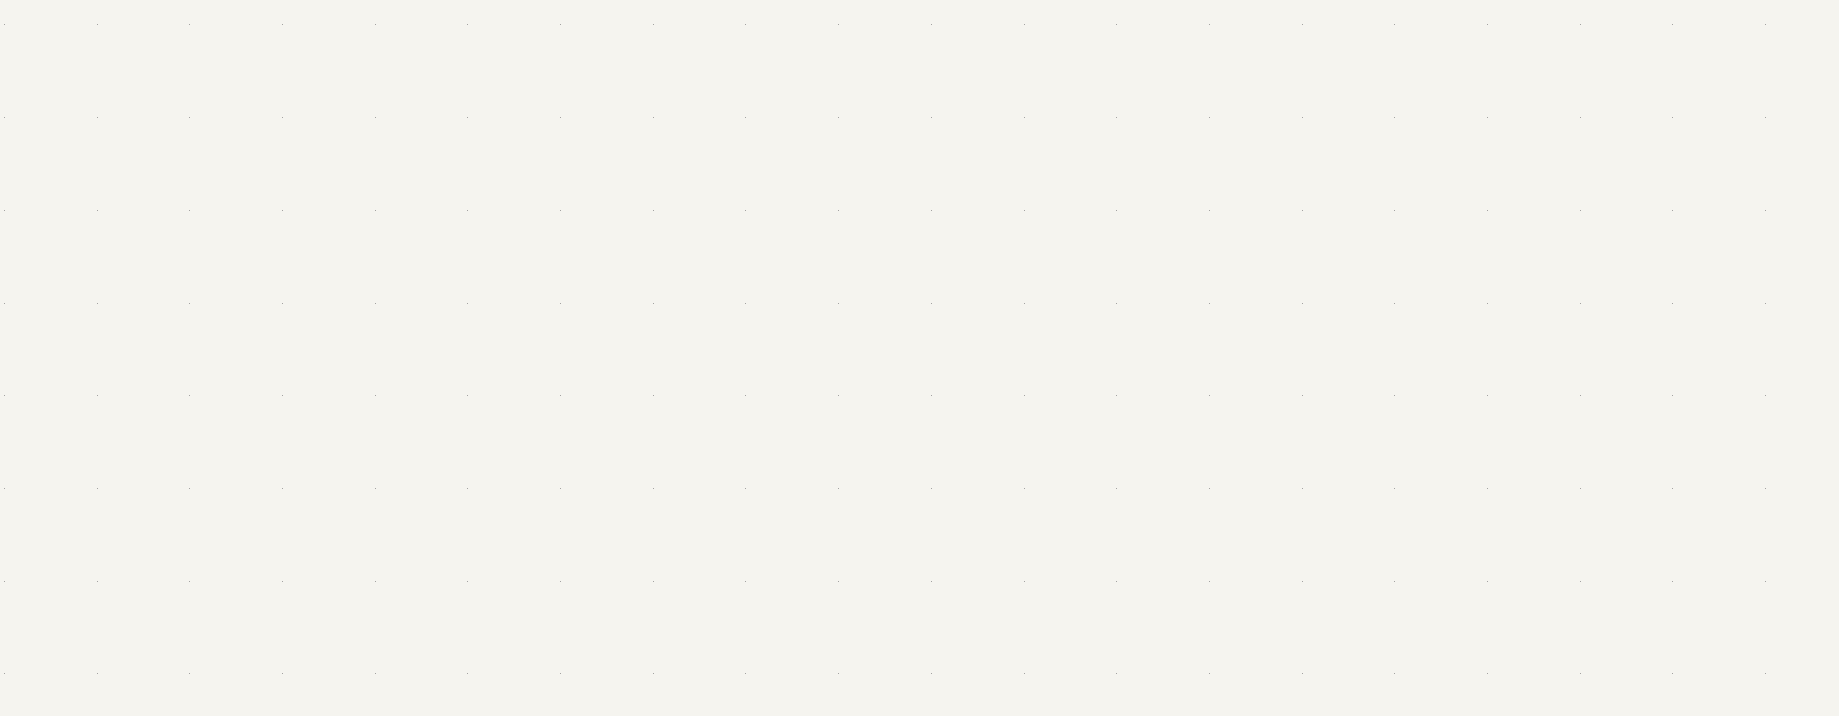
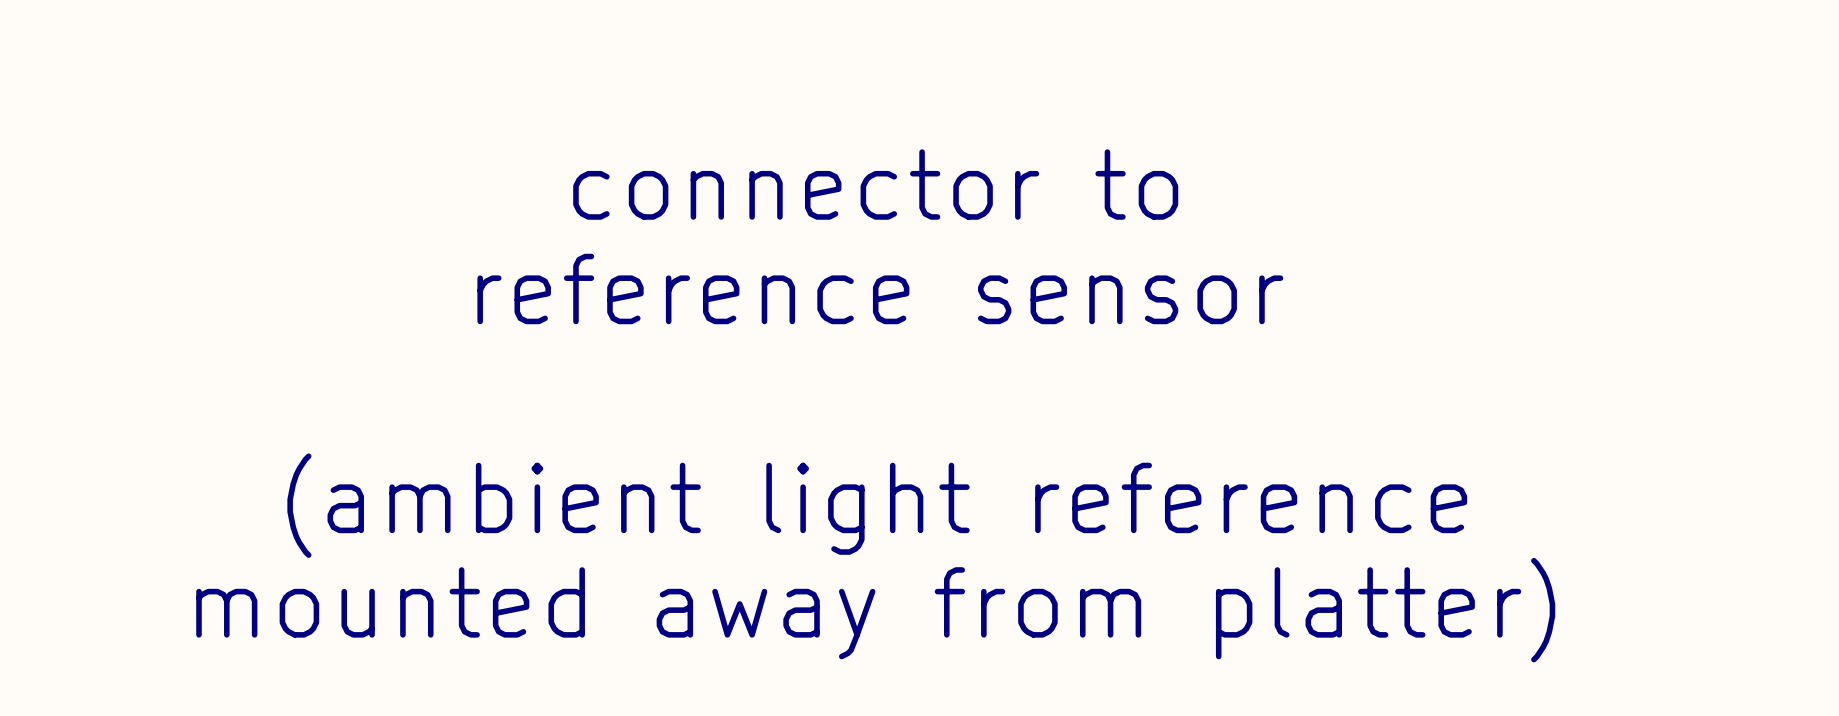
text: none -> connector to (875, 184)
text: none -> reference sensor (880, 289)
text: none -> (ambient light reference (877, 505)
text: none -> mounted away from platter) (875, 610)

